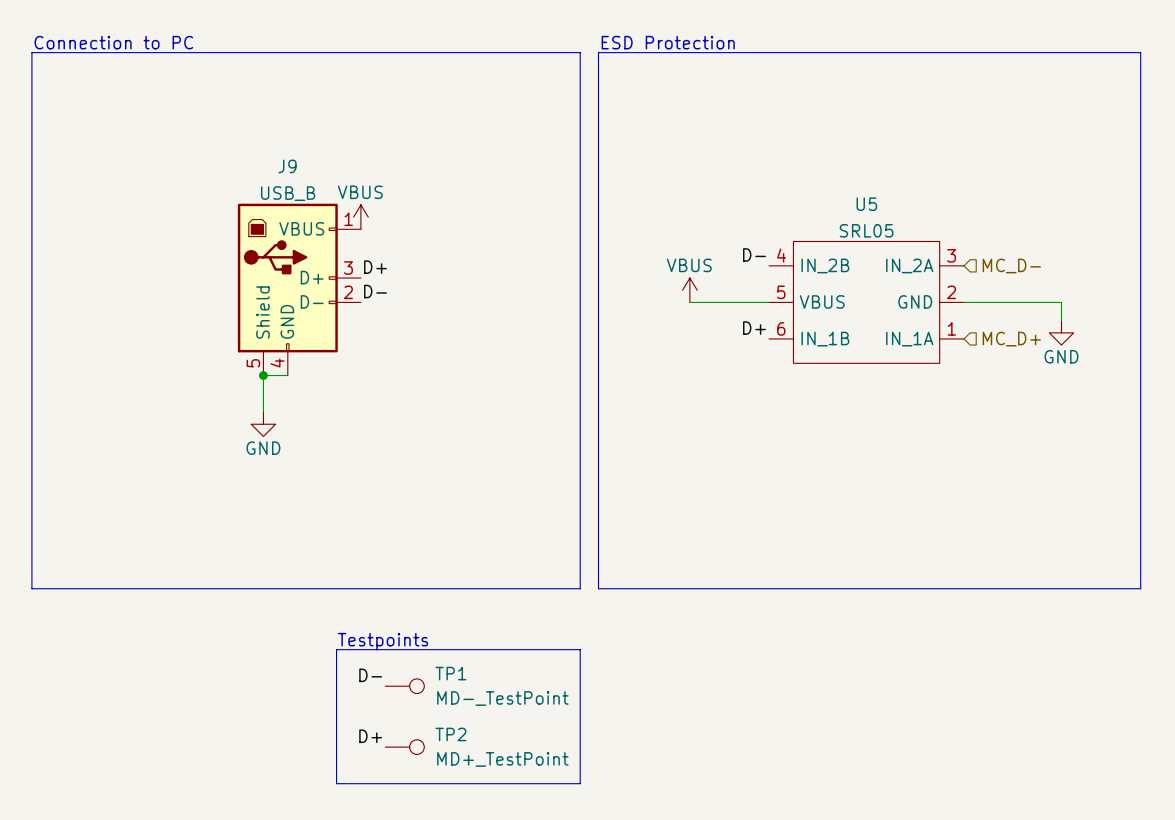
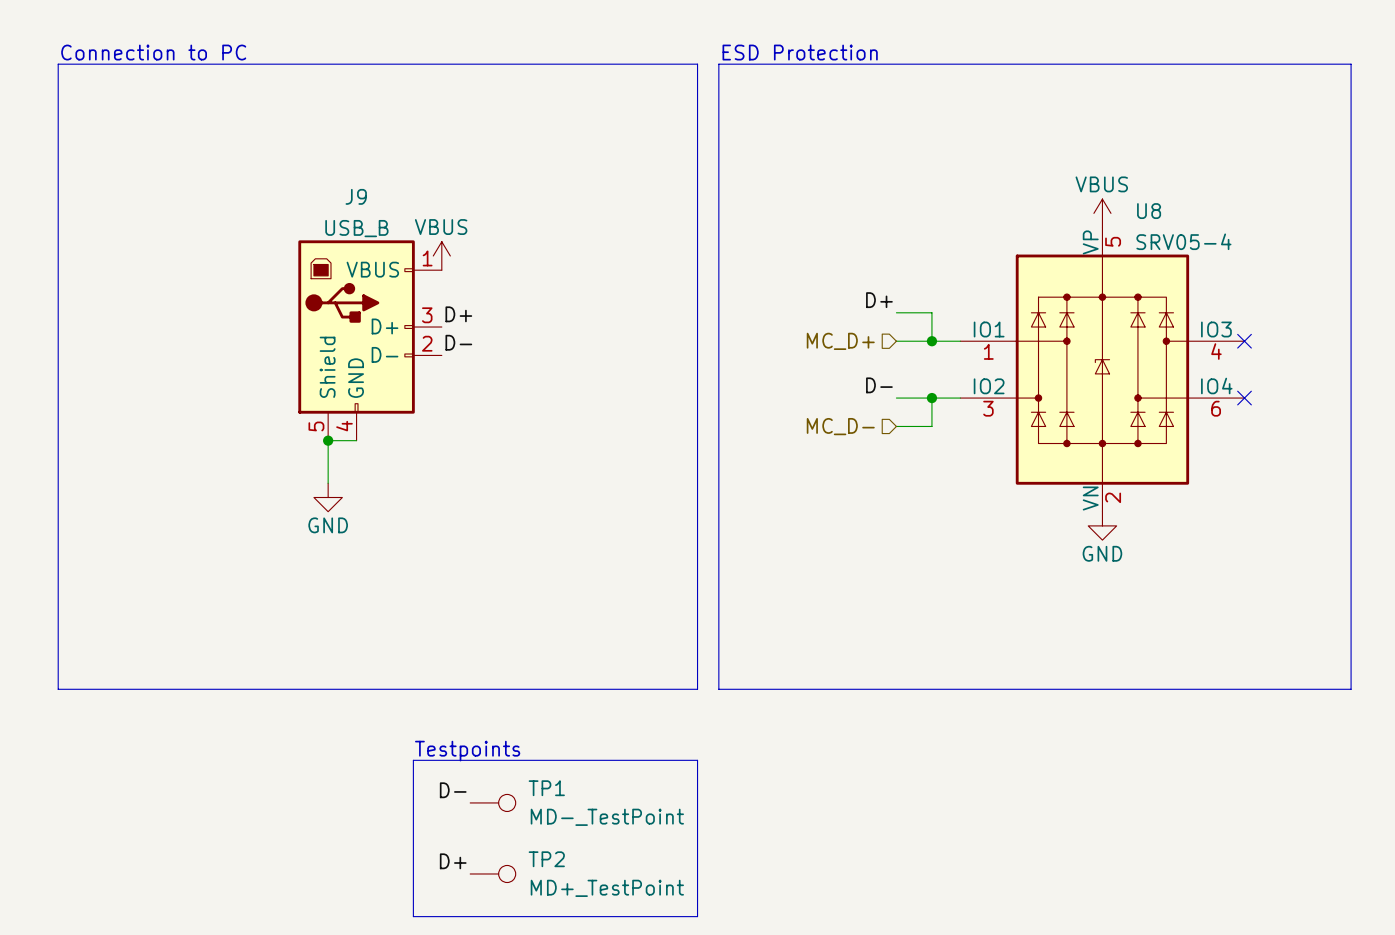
power symbol: none -> VBUS (1102, 213)
label position: D- (754, 254) -> D- (879, 385)
wire: none -> (896, 312) (931, 312) (931, 341)
hierarchical label: MC_D- (1011, 265) -> none
power symbol: VBUS (689, 290) -> none
hierarchical label: none -> MC_D+ (840, 341)
wire: none -> (896, 341) (960, 341)
junction: none -> (931, 341)
no-connect mark: none -> (1244, 341)
wire: (689, 302) (769, 302) -> none
U5: SRL05 (866, 302) -> none
wire: (964, 302) (1061, 302) (1061, 320) -> none
U8: none -> SRV05-4 (1102, 369)
label position: D+ (754, 328) -> D+ (879, 300)
power symbol position: GND (1061, 332) -> GND (1102, 525)
wire: none -> (896, 398) (960, 398)
wire: none -> (931, 398) (931, 426) (896, 426)
junction: none -> (931, 398)
no-connect mark: none -> (1244, 398)
hierarchical label: MC_D+ (1011, 339) -> none
hierarchical label: none -> MC_D- (840, 426)

